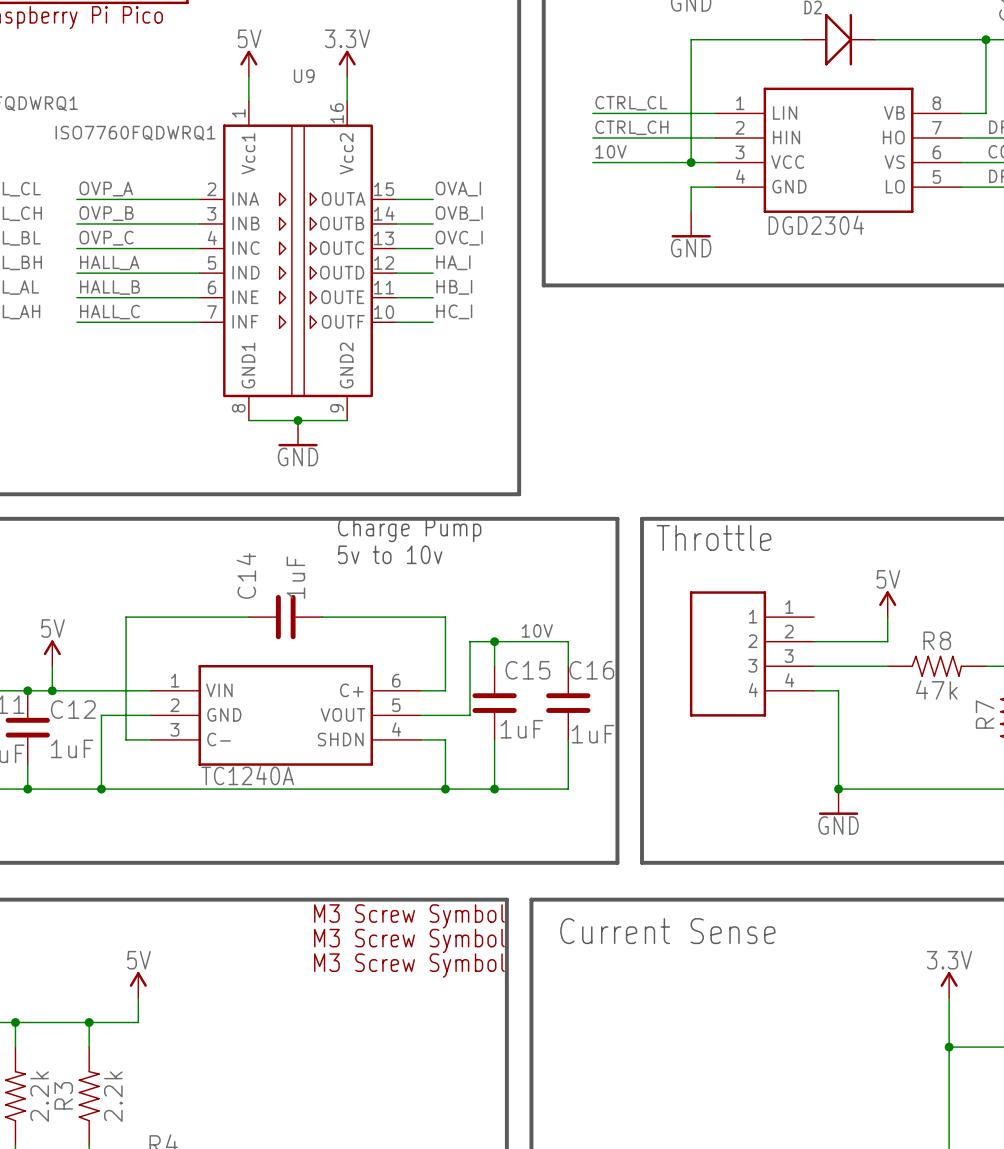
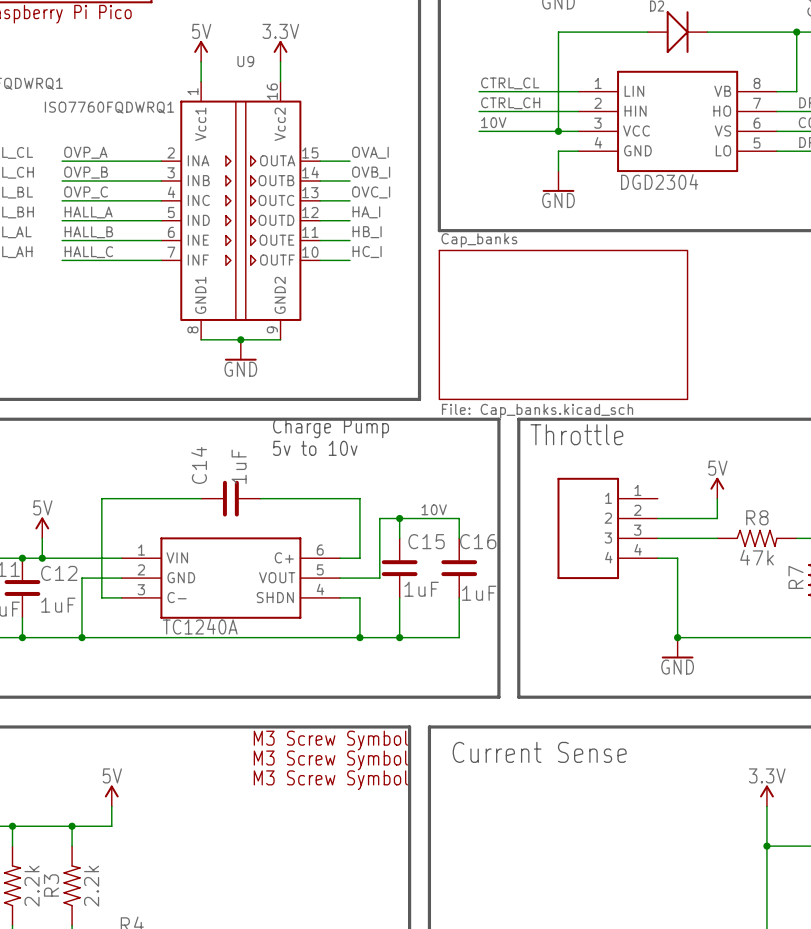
sheet Cap_banks: none -> File: Cap_banks.kicad_sch (563, 324)

